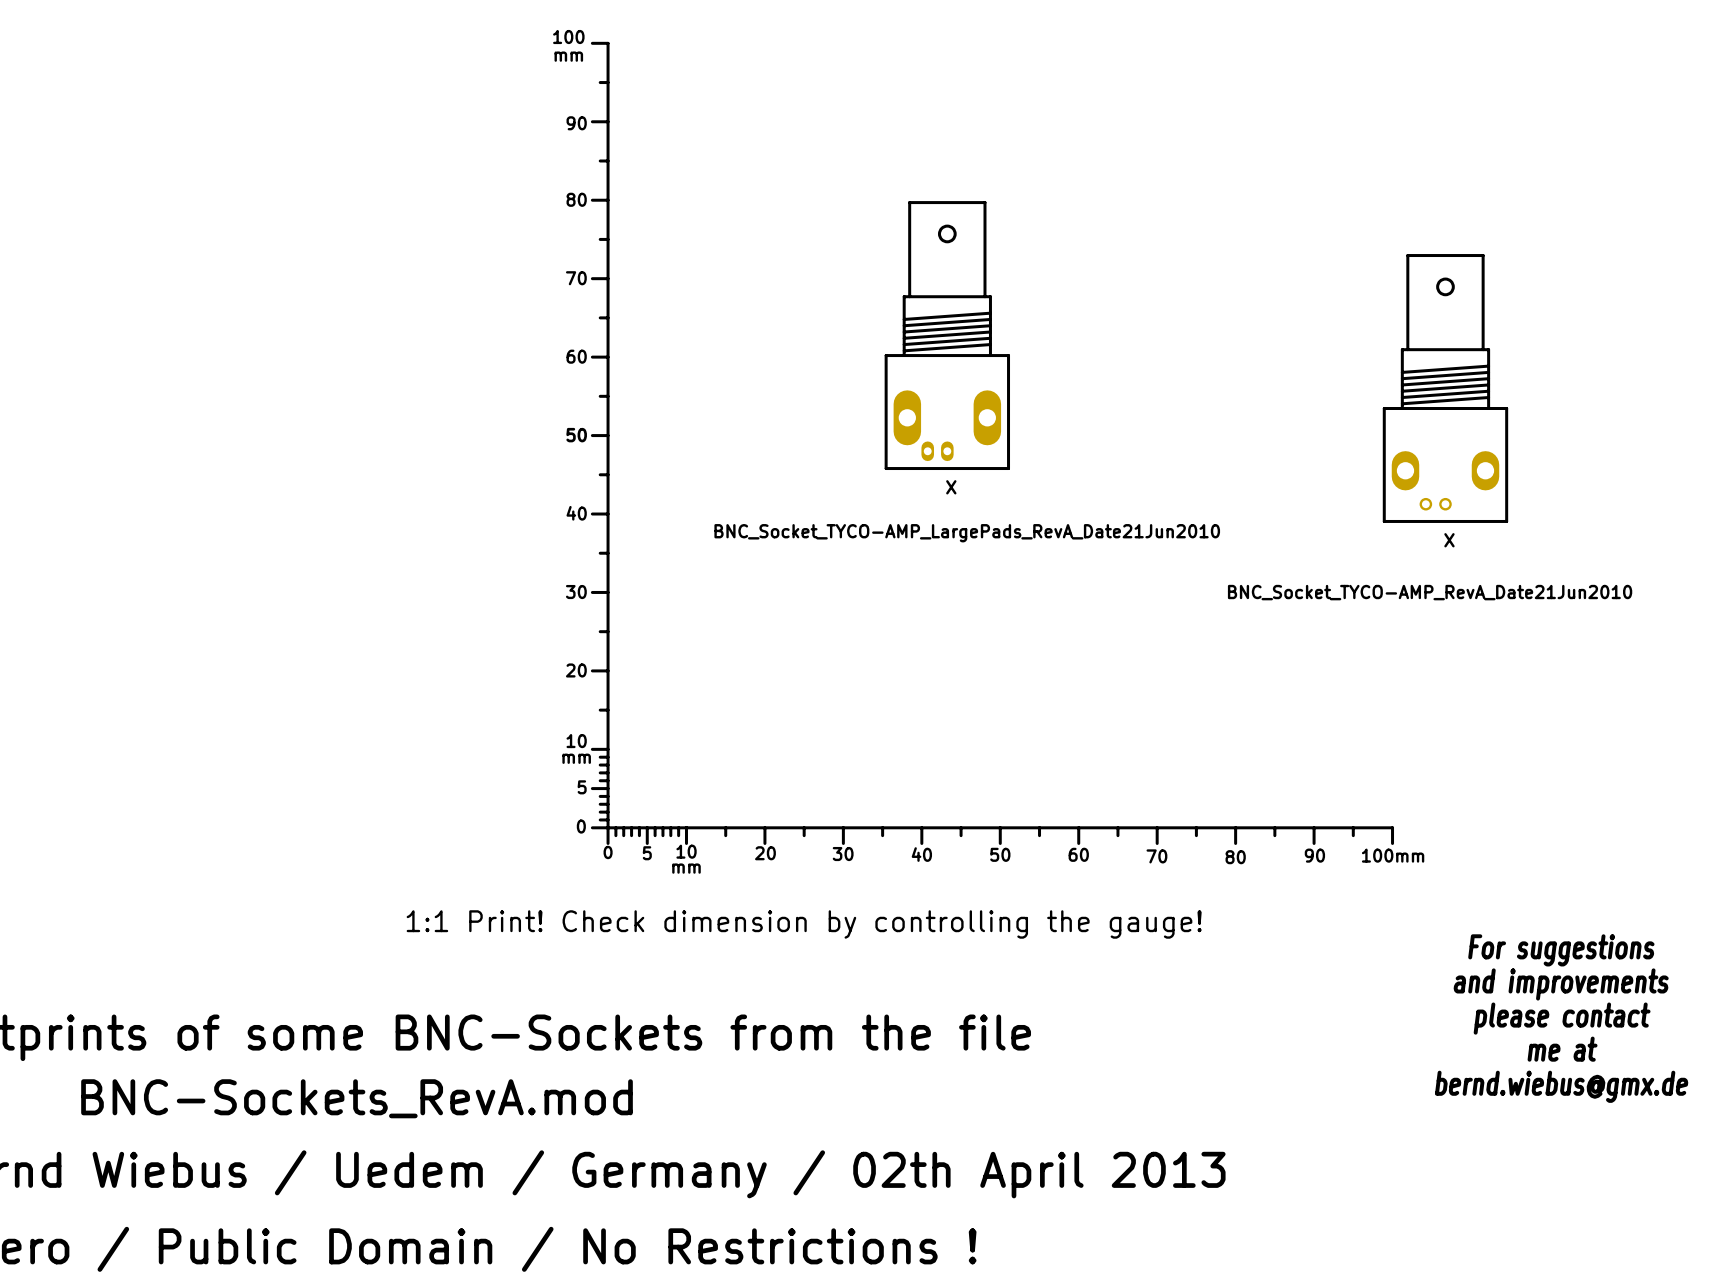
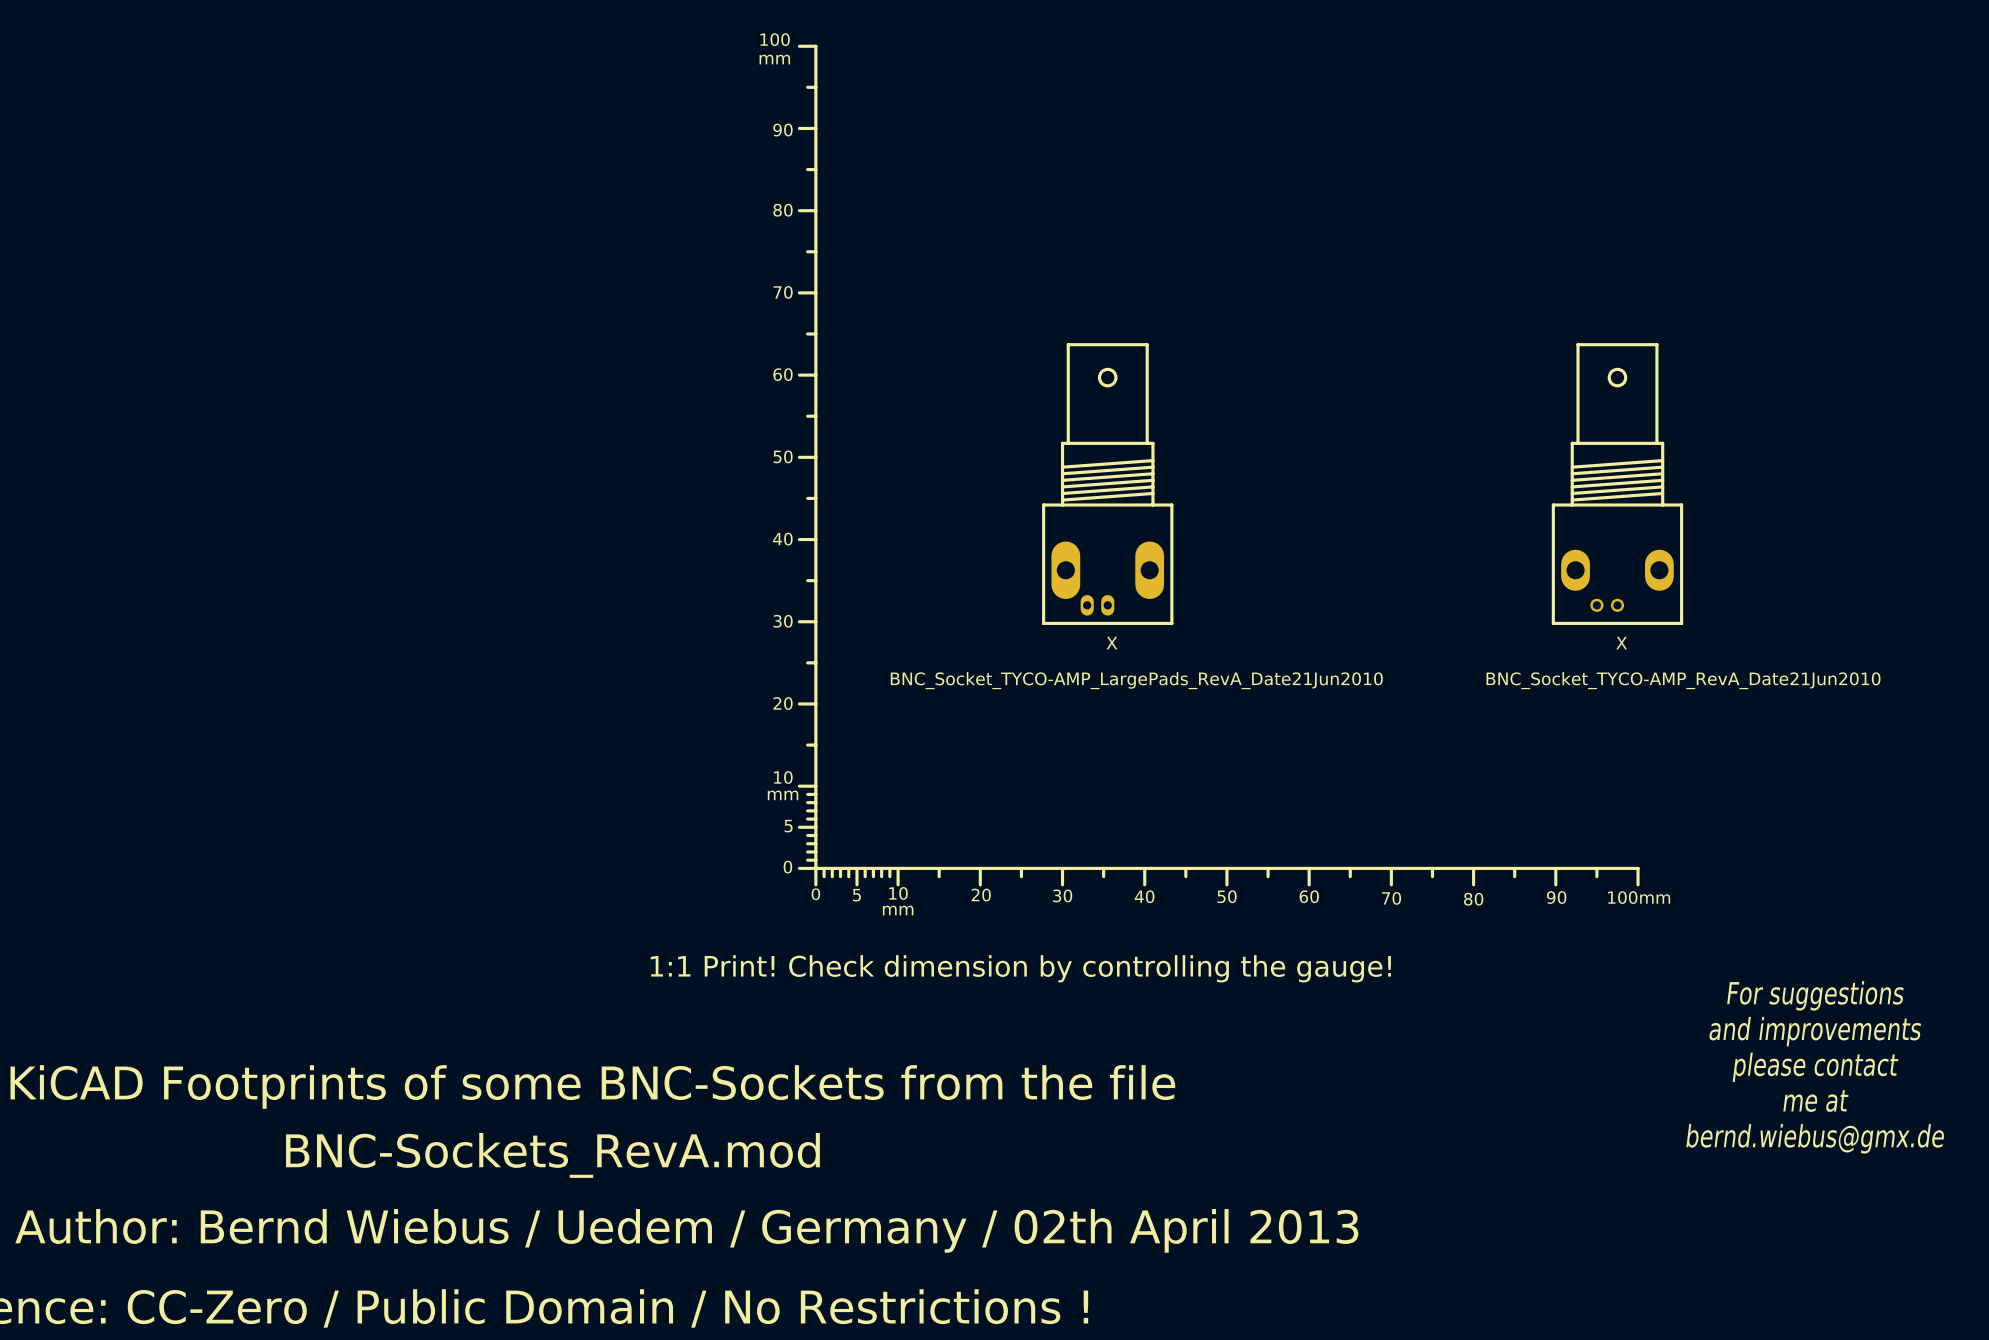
X position: (947, 335) -> (1107, 484)
X position: (1445, 388) -> (1617, 484)
X value position: BNC_Socket_TYCO-AMP_LargePads_RevA_Date21Jun2010 (967, 533) -> BNC_Socket_TYCO-AMP_LargePads_RevA_Date21Jun2010 (1136, 680)
X value position: BNC_Socket_TYCO-AMP_RevA_Date21Jun2010 (1430, 592) -> BNC_Socket_TYCO-AMP_RevA_Date21Jun2010 (1683, 680)

